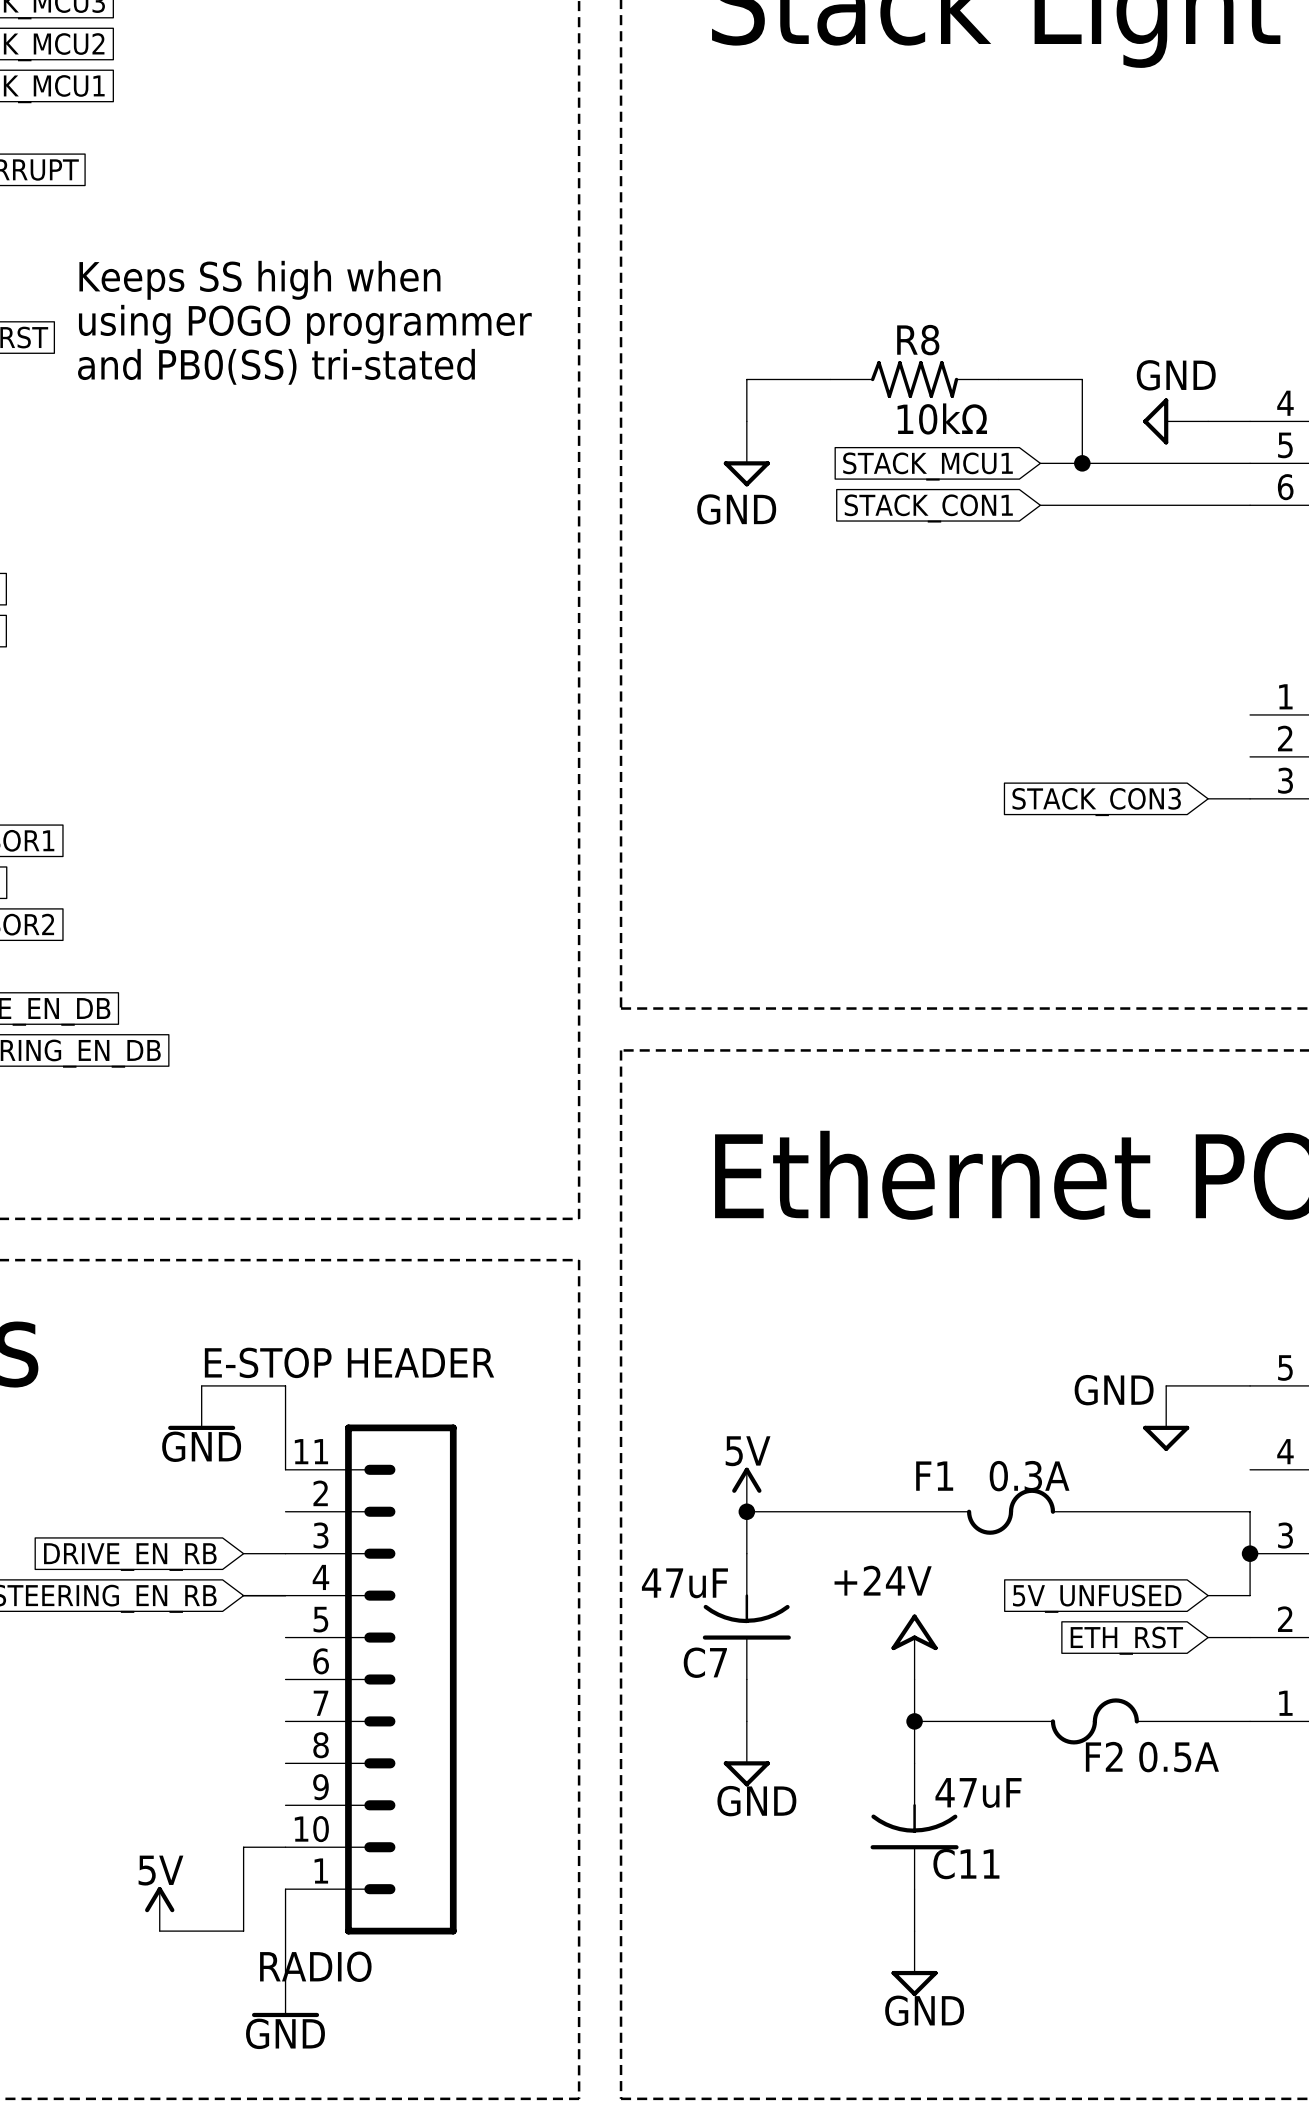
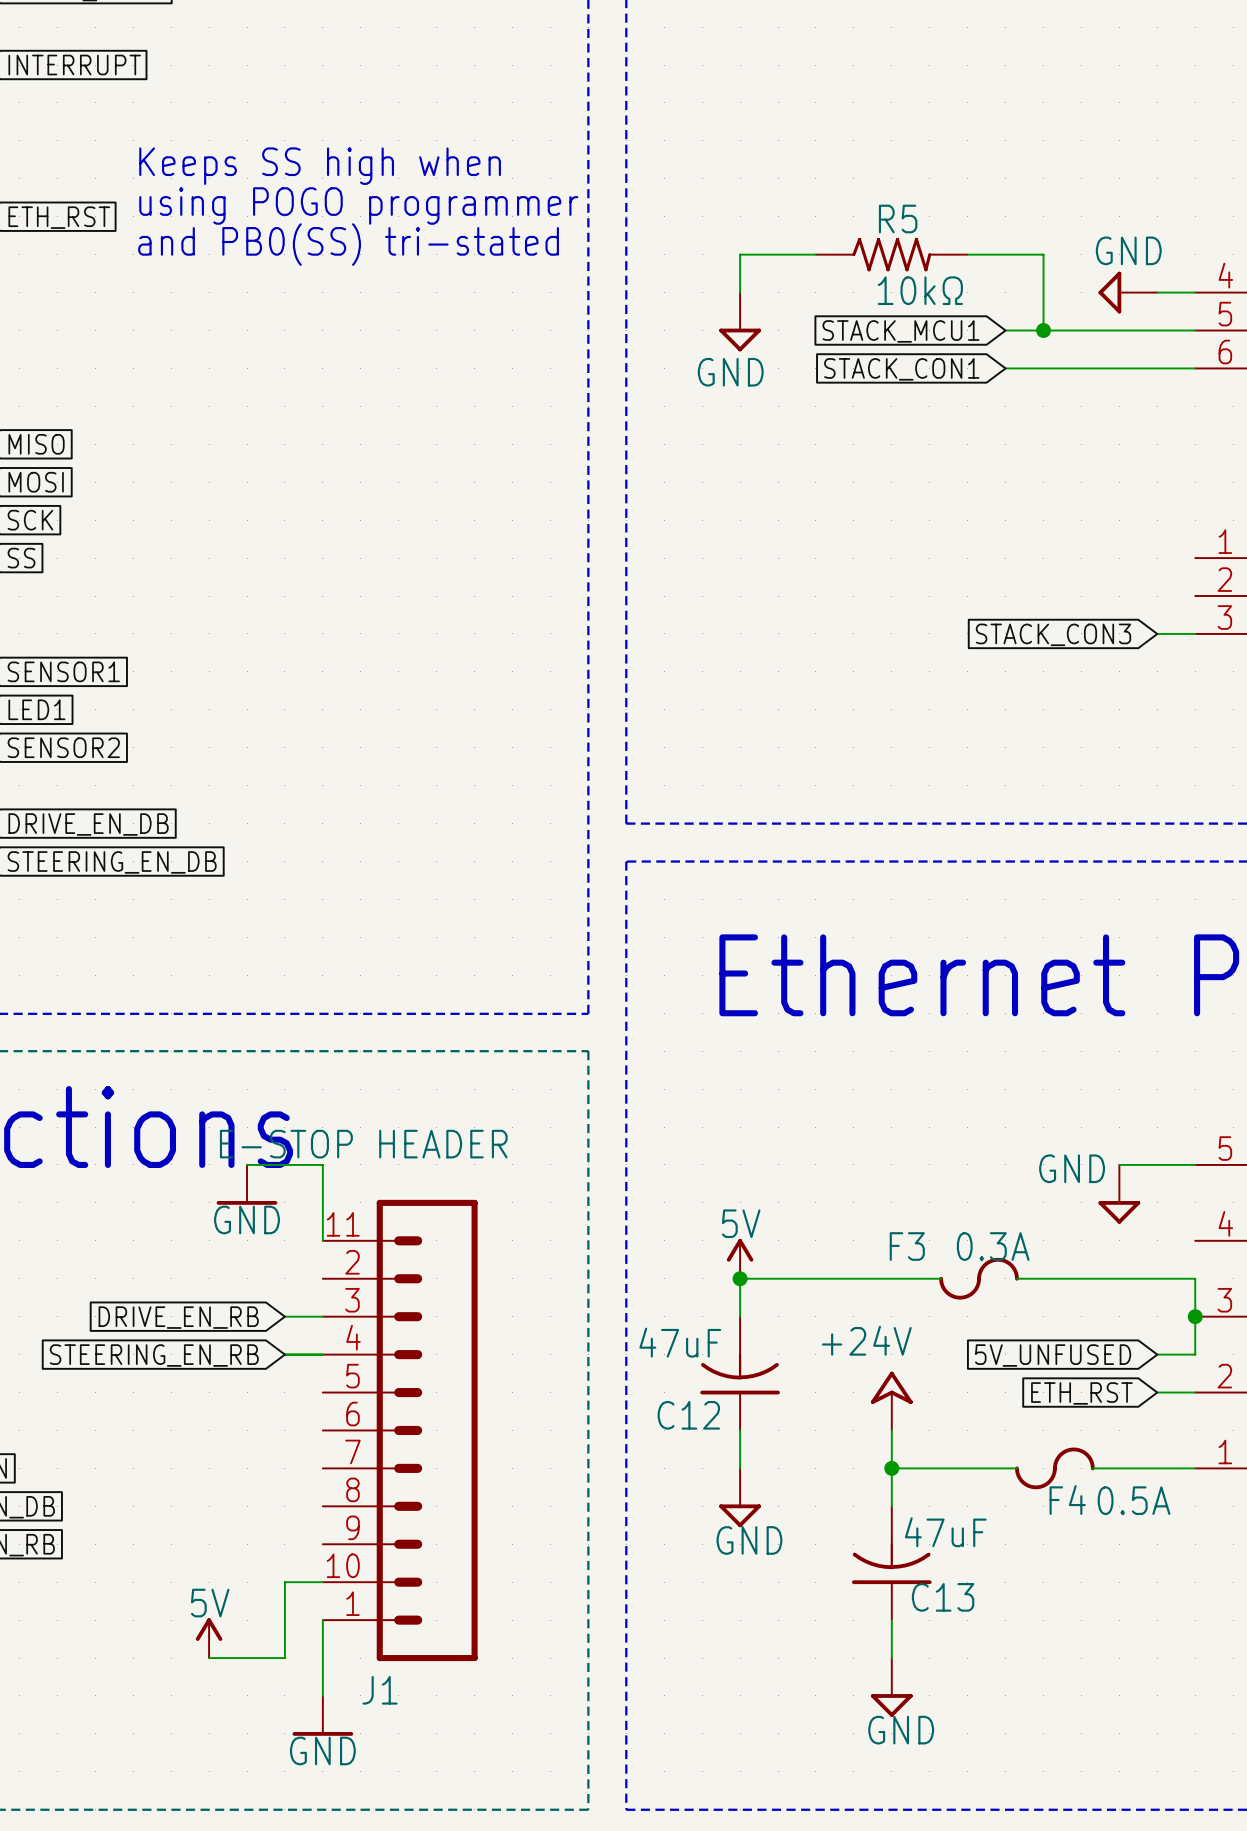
R8 name: R8 (918, 340) -> R5 (898, 218)
F1 name: F1 (934, 1476) -> F3 (907, 1246)
C7 name: C7 (705, 1662) -> C12 (688, 1415)
F2 name: F2 (1104, 1756) -> F4 (1067, 1500)
C11 name: C11 (966, 1864) -> C13 (943, 1597)
RADIO name: RADIO (315, 1966) -> J1 (380, 1690)

